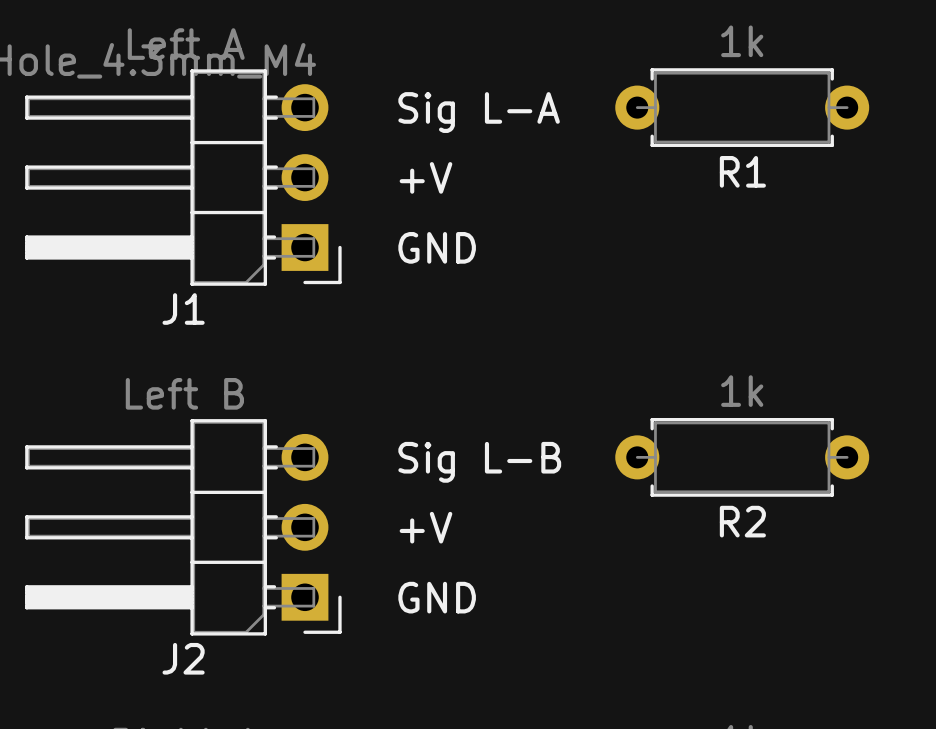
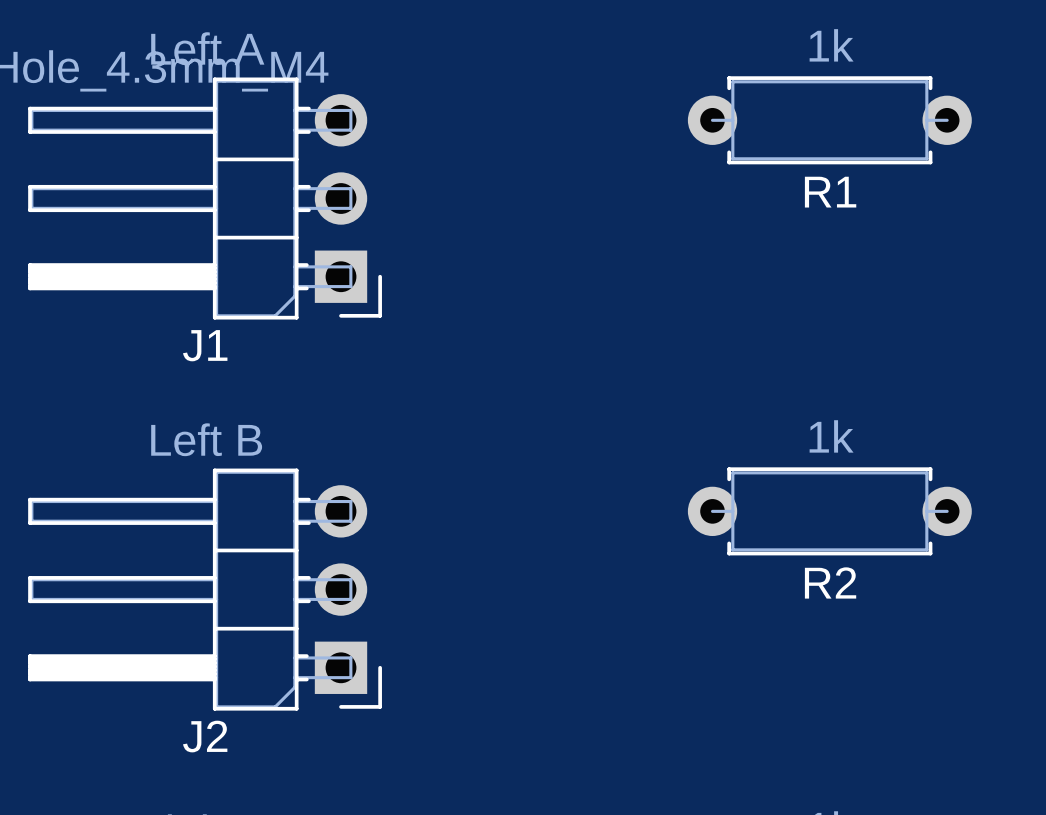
text: Sig L-A (479, 112) -> none
text: +V (425, 177) -> none
text: GND (437, 247) -> none
text: Sig L-B (479, 462) -> none
text: +V (425, 527) -> none
text: GND (437, 597) -> none

